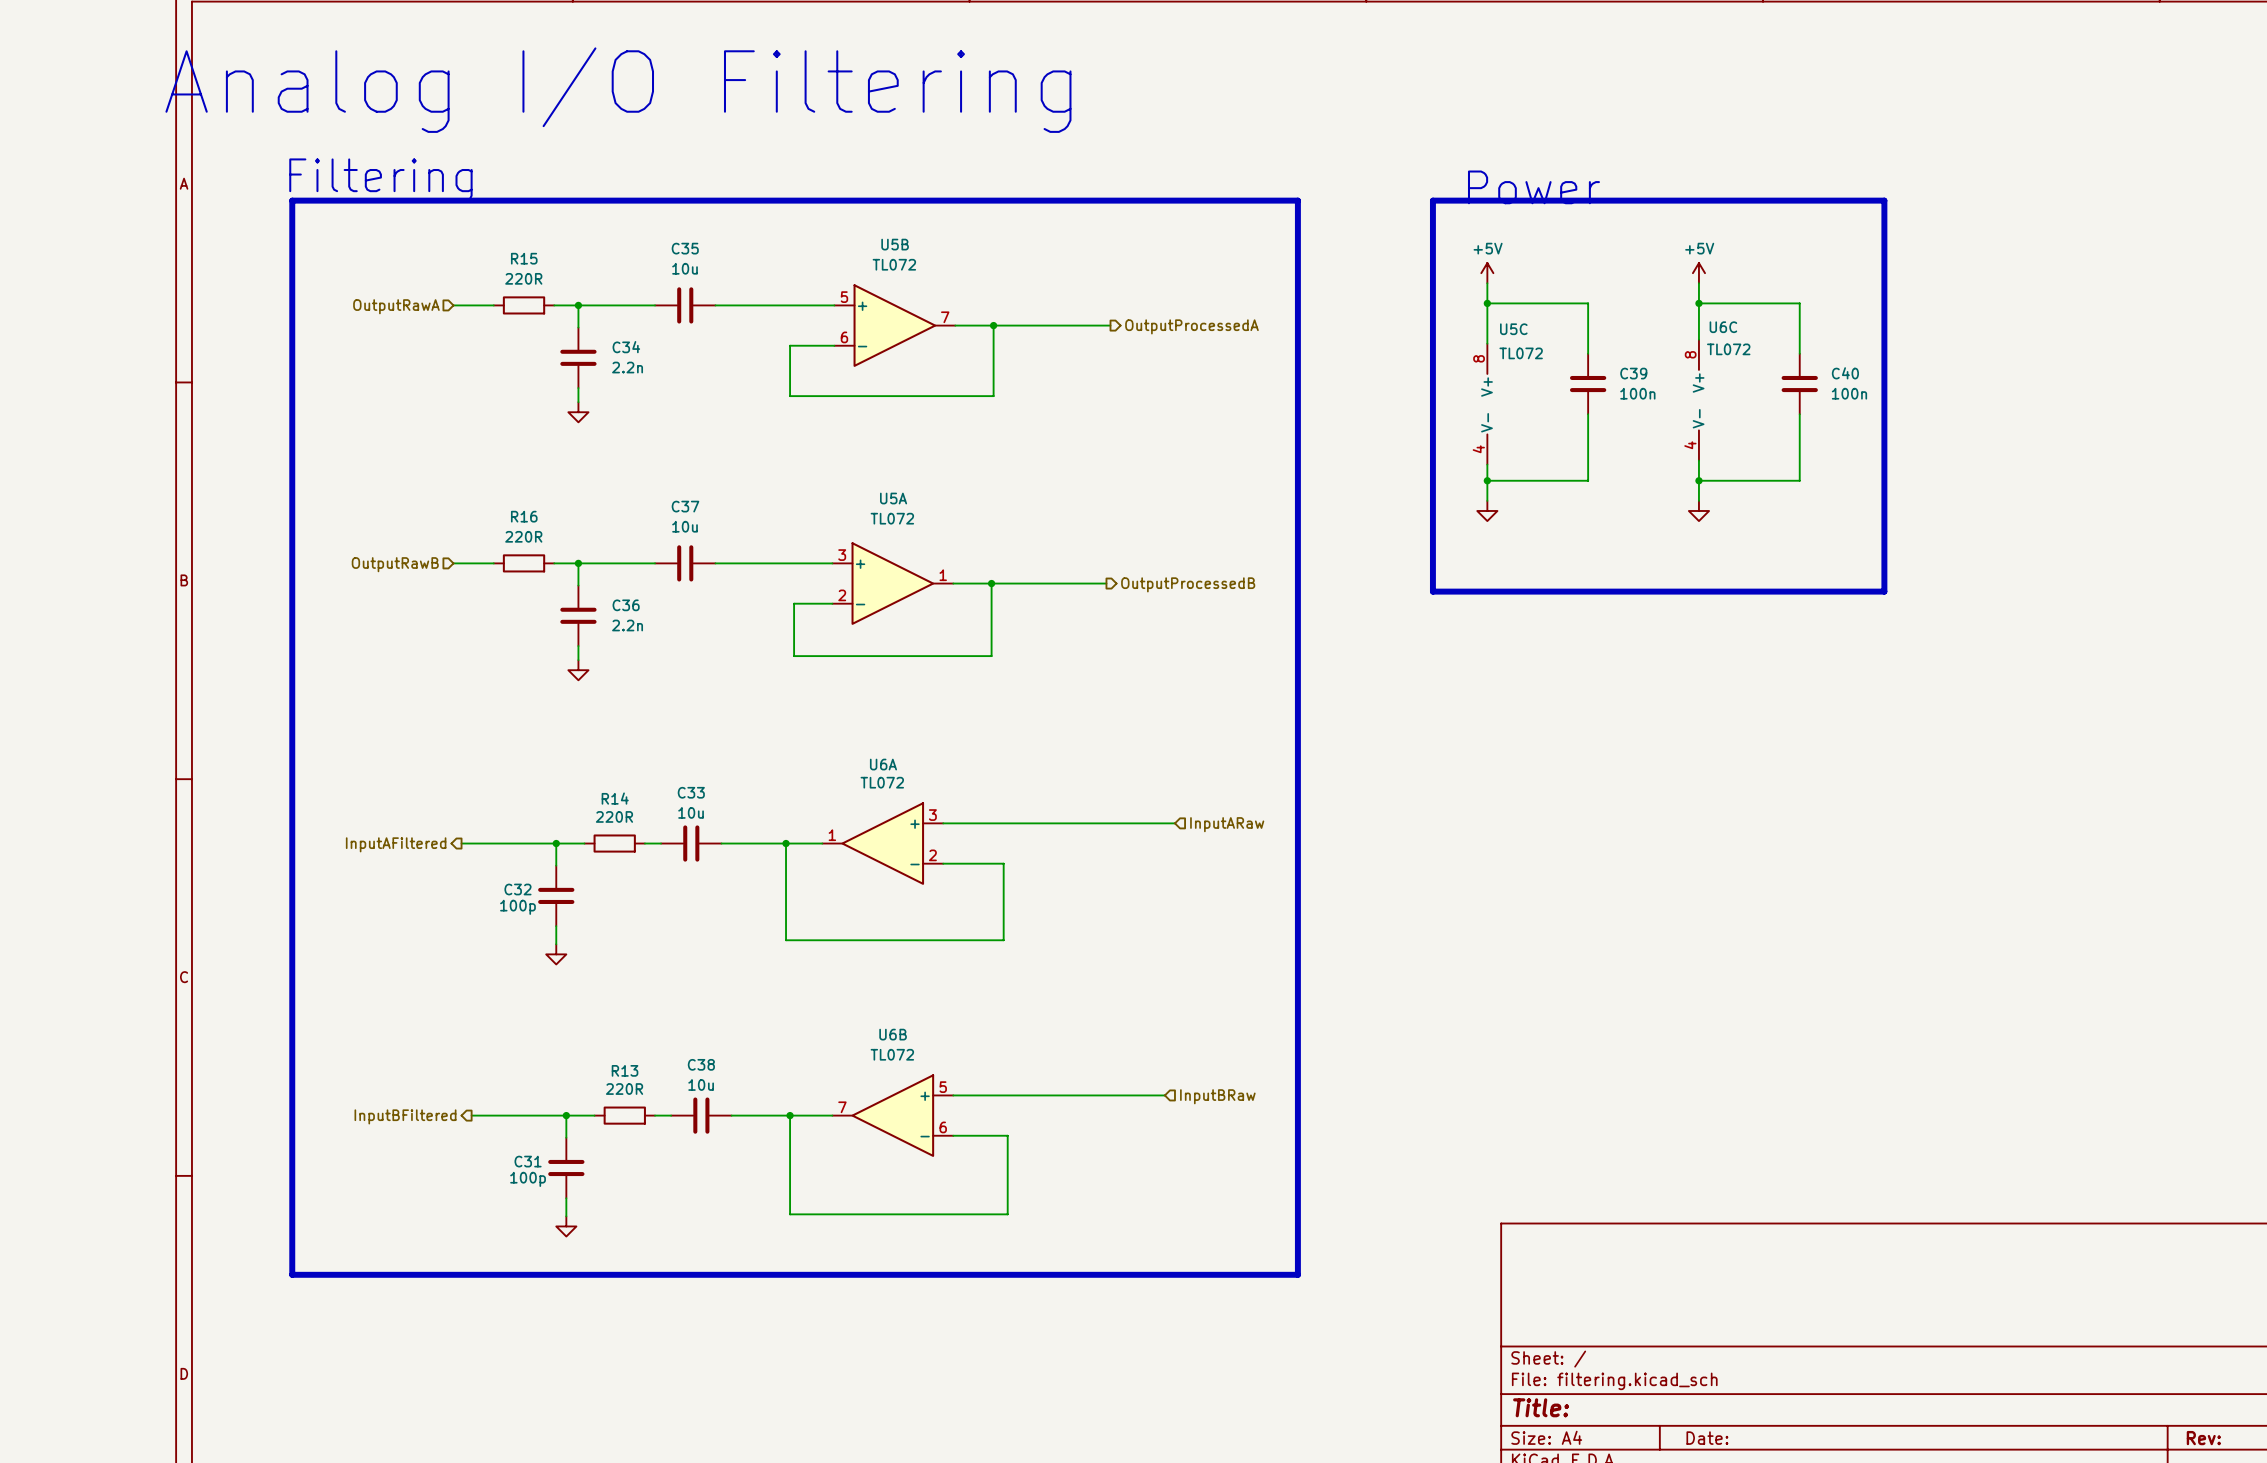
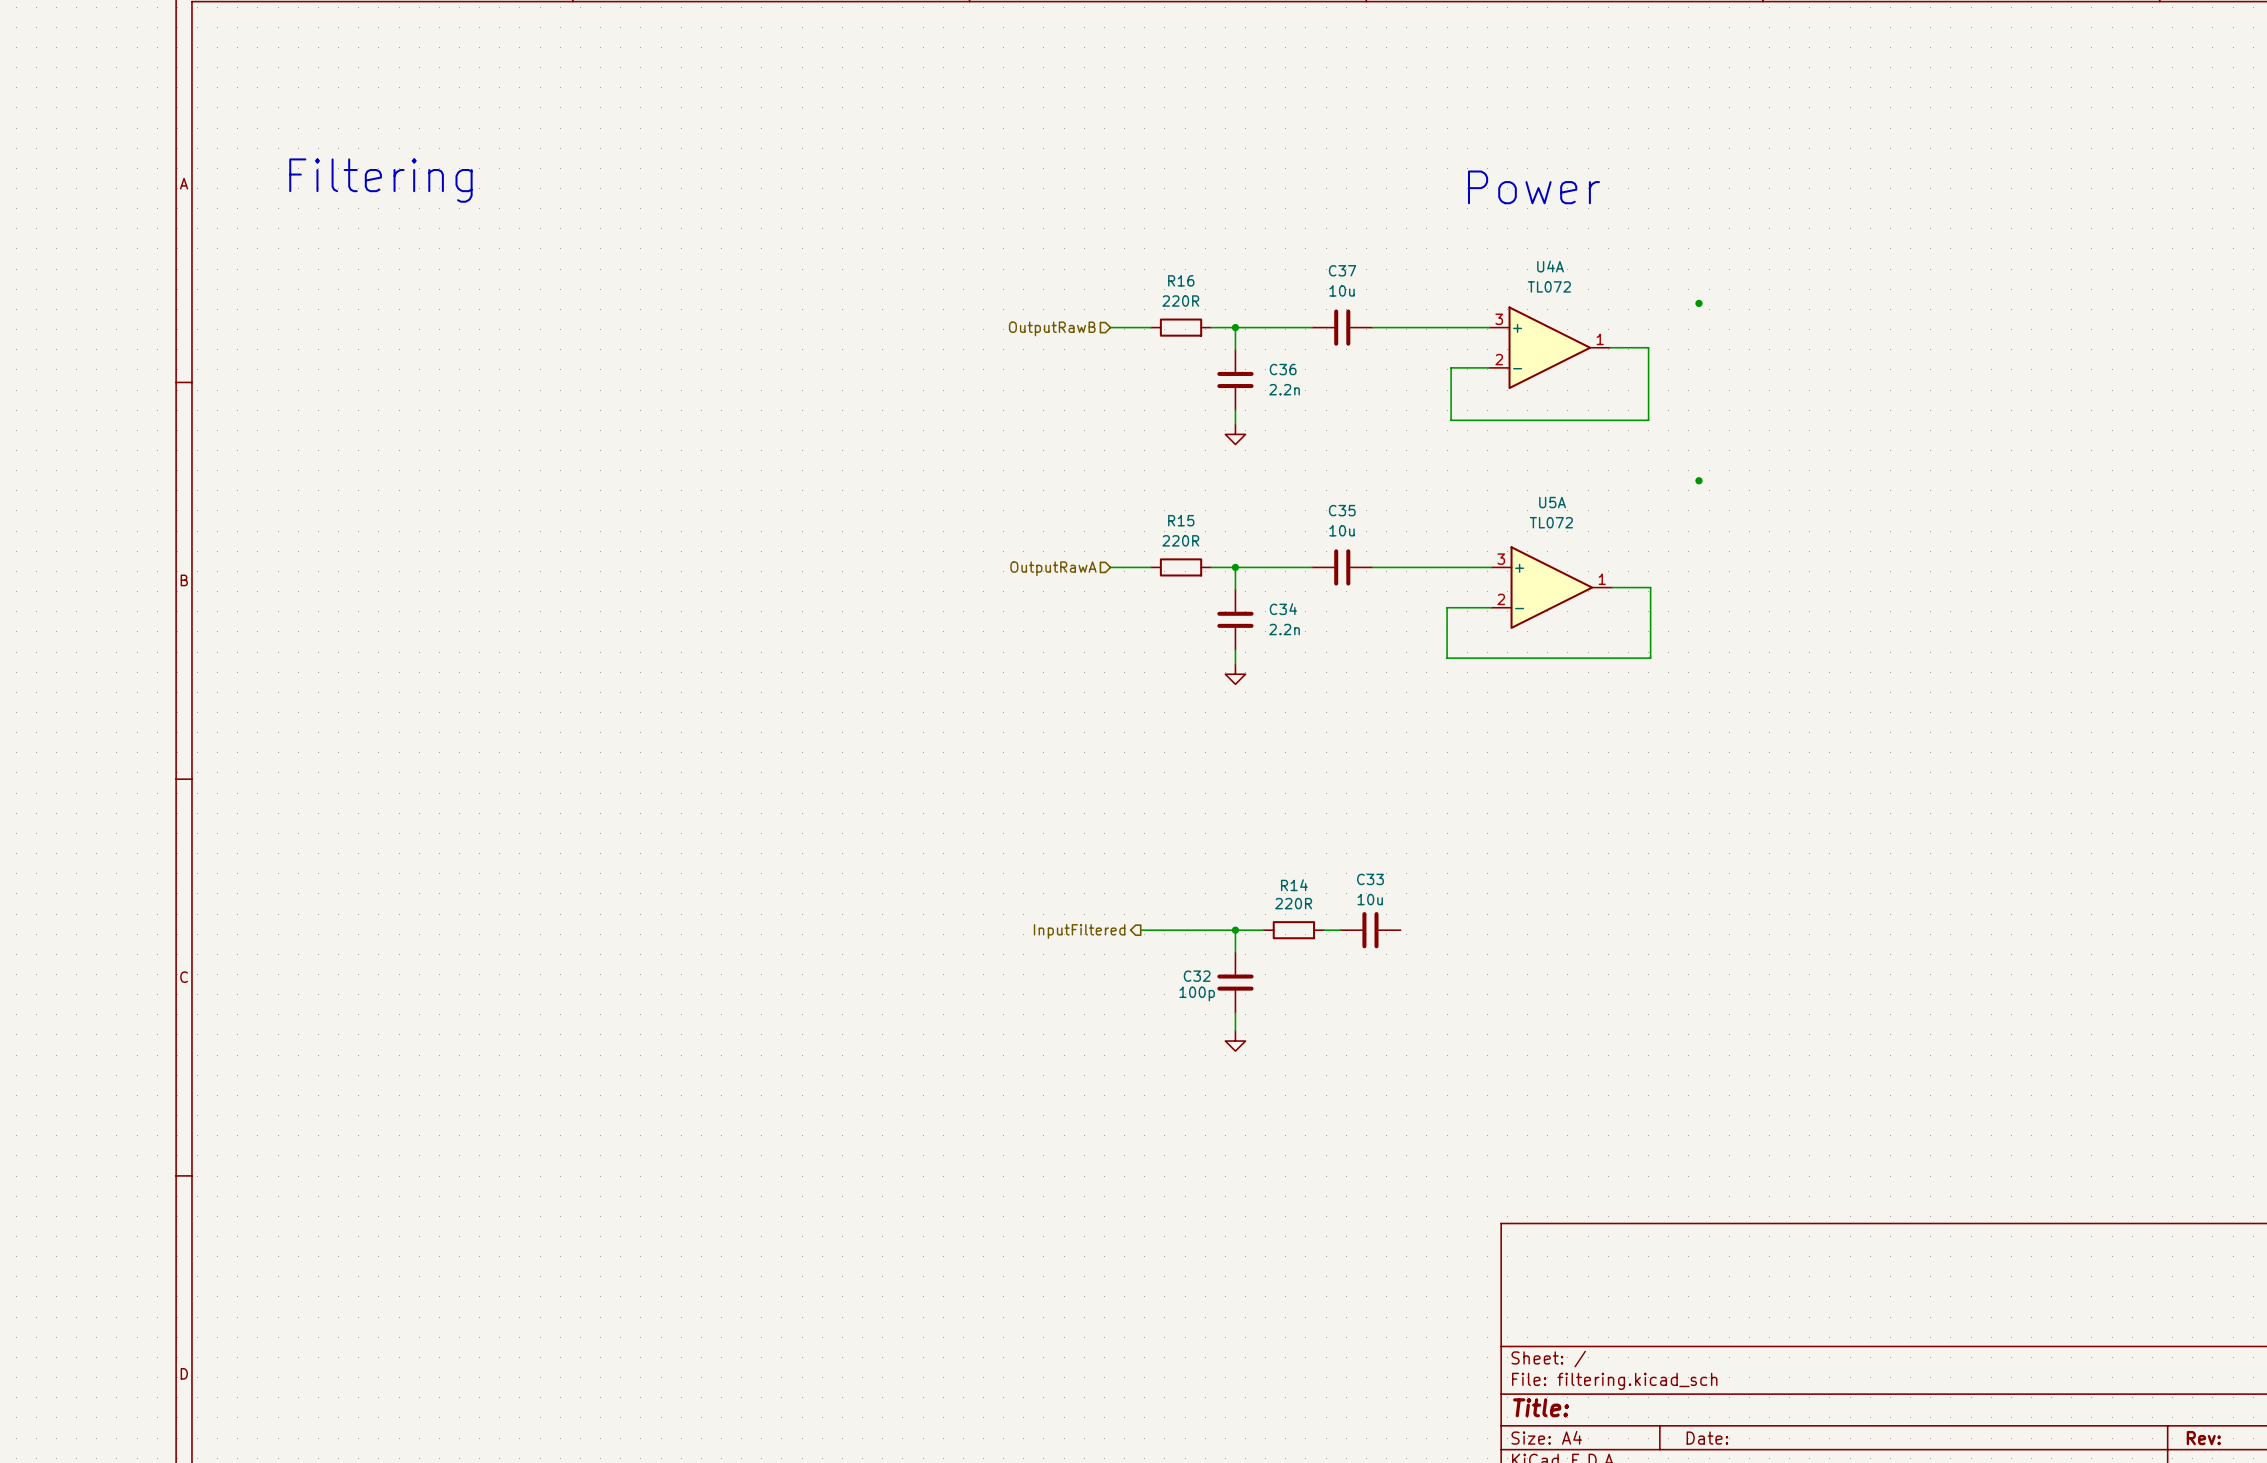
text: Analog I/O Filtering (618, 90) -> none
line: (292, 200) (1297, 200) (1297, 1274) (292, 1274) (292, 200) -> none
line: (1432, 200) (1884, 200) (1884, 591) (1432, 591) (1432, 200) -> none
power symbol: +5V (1487, 273) -> none
power symbol: +5V (1698, 273) -> none
wire: (1487, 283) (1487, 343) -> none
wire: (1698, 283) (1698, 339) -> none
wire: (1487, 303) (1588, 303) (1588, 353) -> none
junction: (1487, 303) -> none
wire: (1698, 303) (1799, 303) (1799, 353) -> none
wire: (453, 305) (493, 305) -> none
R15 position: (524, 305) -> (1181, 567)
wire: (554, 305) (655, 305) -> none
wire: (578, 305) (578, 327) -> none
junction: (578, 305) -> none
C35 position: (685, 305) -> (1342, 567)
wire: (715, 305) (834, 305) -> none
hierarchical label: OutputRawA (396, 306) -> none
U5B: TL072 (894, 325) -> none
wire: (955, 325) (1110, 325) -> none
wire: (993, 325) (993, 396) (790, 396) (790, 345) (834, 345) -> none
junction: (993, 325) -> none
hierarchical label: OutputProcessedA (1191, 326) -> none
wire: none -> (1110, 327) (1150, 327)
wire: none -> (1211, 327) (1312, 327)
wire: none -> (1235, 327) (1235, 349)
junction: none -> (1235, 327)
wire: none -> (1372, 327) (1489, 327)
hierarchical label: none -> OutputRawB (1052, 328)
U4A: none -> TL072 (1549, 347)
wire: none -> (1610, 347) (1648, 347) (1648, 420) (1451, 420) (1451, 367) (1489, 367)
C34 position: (578, 357) -> (1235, 619)
C39: 100n (1588, 384) -> none
C40: 100n (1799, 384) -> none
wire: (578, 388) (578, 402) -> none
U6C: TL072 (1698, 400) -> none
U5C: TL072 (1487, 404) -> none
wire: none -> (1235, 410) (1235, 424)
power symbol: (578, 412) -> none
wire: (1588, 414) (1588, 480) (1487, 480) -> none
wire: (1799, 414) (1799, 480) (1698, 480) -> none
power symbol: none -> (1235, 434)
wire: (1698, 460) (1698, 500) -> none
wire: (1487, 464) (1487, 500) -> none
junction: (1487, 480) -> none
power symbol: (1487, 510) -> none
power symbol: (1698, 510) -> none
wire: (453, 563) (493, 563) -> none
R16 position: (524, 563) -> (1181, 327)
wire: (554, 563) (655, 563) -> none
wire: (578, 563) (578, 585) -> none
junction: (578, 563) -> none
C37 position: (685, 563) -> (1342, 327)
wire: (715, 563) (832, 563) -> none
hierarchical label: OutputRawB (395, 564) -> none
wire: none -> (1110, 567) (1150, 567)
wire: none -> (1211, 567) (1312, 567)
wire: none -> (1235, 567) (1235, 589)
junction: none -> (1235, 567)
wire: none -> (1372, 567) (1491, 567)
hierarchical label: none -> OutputRawA (1053, 568)
U5A position: (892, 583) -> (1551, 587)
wire: (953, 583) (1106, 583) -> none
wire: (991, 583) (991, 656) (794, 656) (794, 603) (832, 603) -> none
junction: (991, 583) -> none
hierarchical label: OutputProcessedB (1188, 584) -> none
wire: none -> (1612, 587) (1650, 587) (1650, 658) (1447, 658) (1447, 607) (1491, 607)
C36 position: (578, 615) -> (1235, 379)
wire: (578, 646) (578, 660) -> none
wire: none -> (1235, 650) (1235, 664)
power symbol: (578, 670) -> none
power symbol: none -> (1235, 674)
wire: (943, 823) (1174, 823) -> none
hierarchical label: InputARaw (1227, 824) -> none
wire: (461, 843) (584, 843) -> none
wire: (556, 843) (556, 865) -> none
junction: (556, 843) -> none
R14 position: (614, 843) -> (1293, 930)
wire: (644, 843) (661, 843) -> none
C33 position: (691, 843) -> (1370, 930)
wire: (721, 843) (822, 843) -> none
wire: (786, 843) (786, 940) (1003, 940) (1003, 863) (943, 863) -> none
junction: (786, 843) -> none
U6A: TL072 (882, 843) -> none
hierarchical label: InputAFiltered (396, 844) -> none
C32 position: (556, 895) -> (1235, 982)
wire: (556, 926) (556, 944) -> none
wire: none -> (1140, 930) (1263, 930)
wire: none -> (1235, 930) (1235, 952)
junction: none -> (1235, 930)
wire: none -> (1324, 930) (1340, 930)
hierarchical label: none -> InputFiltered (1079, 931)
power symbol: (556, 954) -> none
wire: none -> (1235, 1012) (1235, 1030)
power symbol: none -> (1235, 1041)
wire: (953, 1095) (1164, 1095) -> none
hierarchical label: InputBRaw (1217, 1096) -> none
wire: (471, 1115) (594, 1115) -> none
wire: (566, 1115) (566, 1137) -> none
junction: (566, 1115) -> none
R13: 220R (624, 1115) -> none
wire: (655, 1115) (671, 1115) -> none
C38: 10u (701, 1115) -> none
wire: (731, 1115) (832, 1115) -> none
wire: (790, 1115) (790, 1214) (1007, 1214) (1007, 1135) (953, 1135) -> none
junction: (790, 1115) -> none
U6B: TL072 (892, 1115) -> none
hierarchical label: InputBFiltered (405, 1116) -> none
C31: 100p (566, 1168) -> none
wire: (566, 1198) (566, 1216) -> none
power symbol: (566, 1226) -> none

